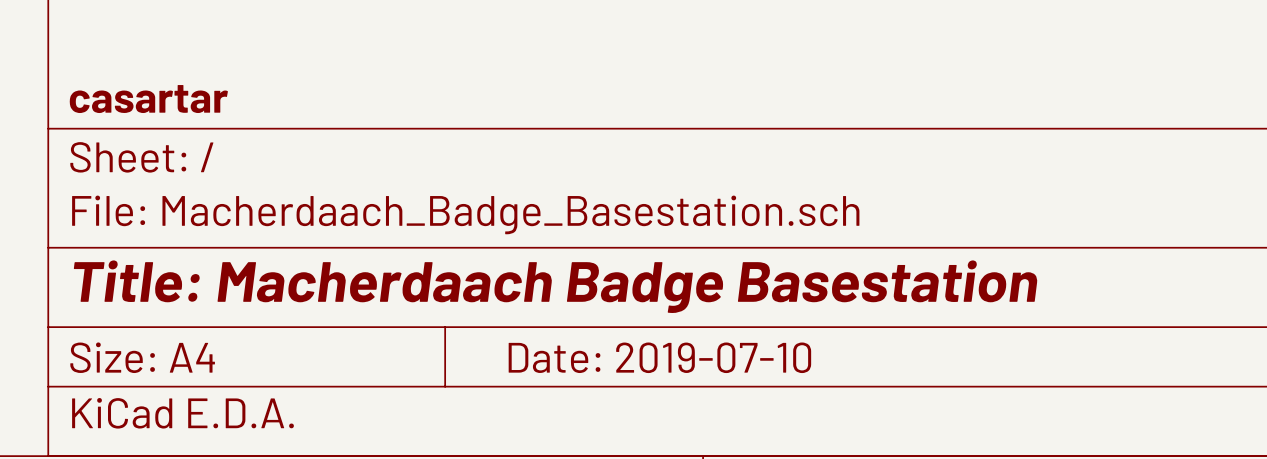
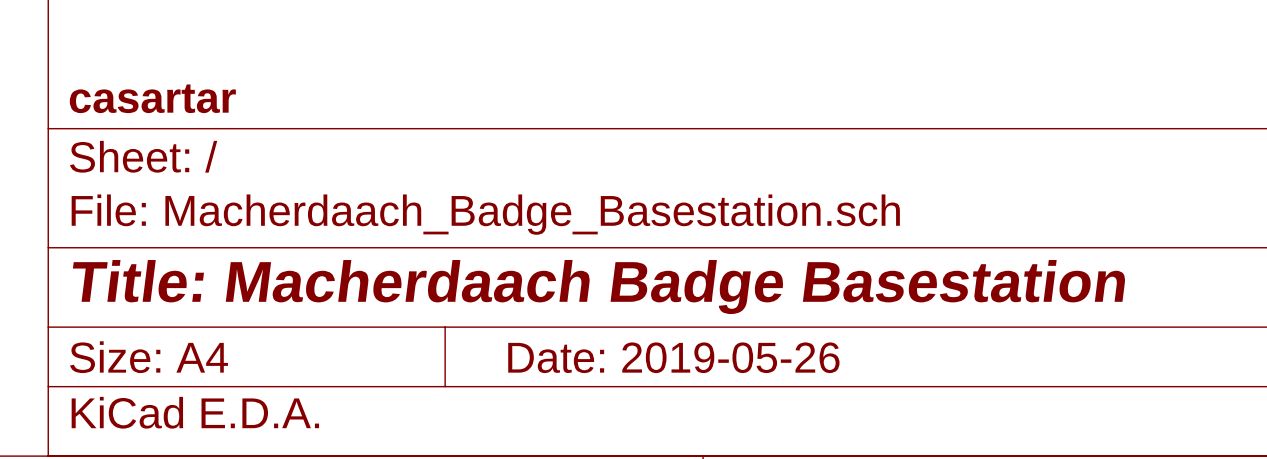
title block: Date: 2019-07-10 (659, 357) -> Date: 2019-05-26 (673, 357)

